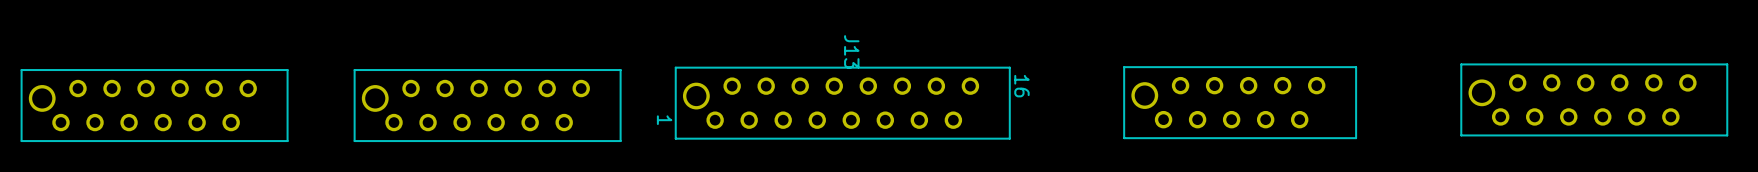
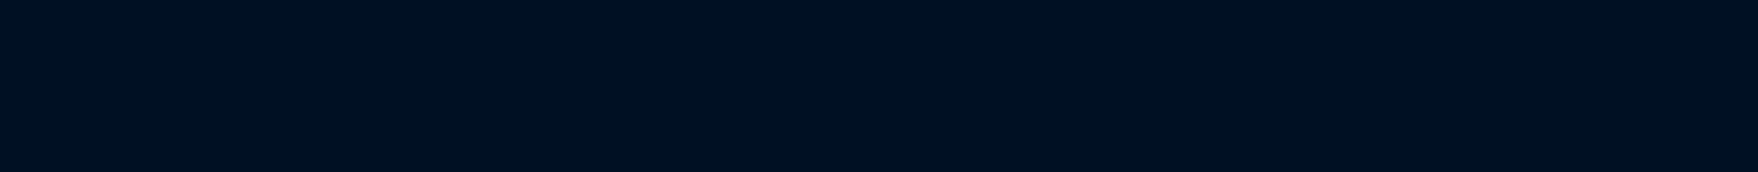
part: (1594, 99) -> none
part: (1240, 102) -> none
J13: (842, 103) -> none
part: (154, 105) -> none
part: (487, 105) -> none

